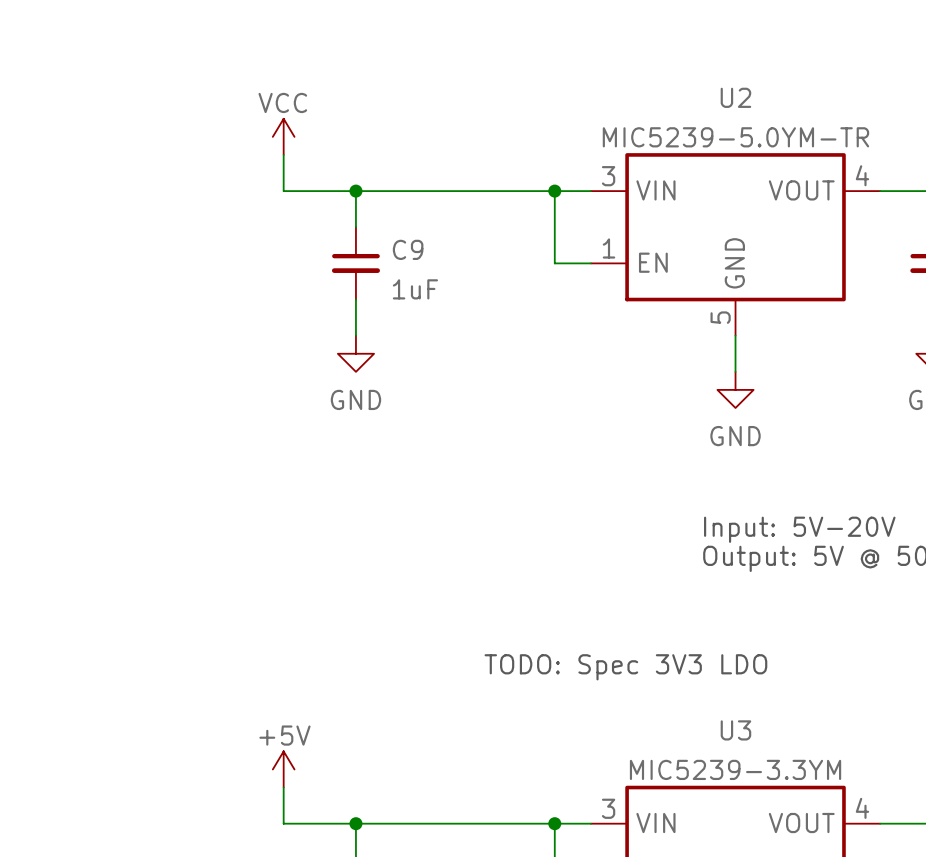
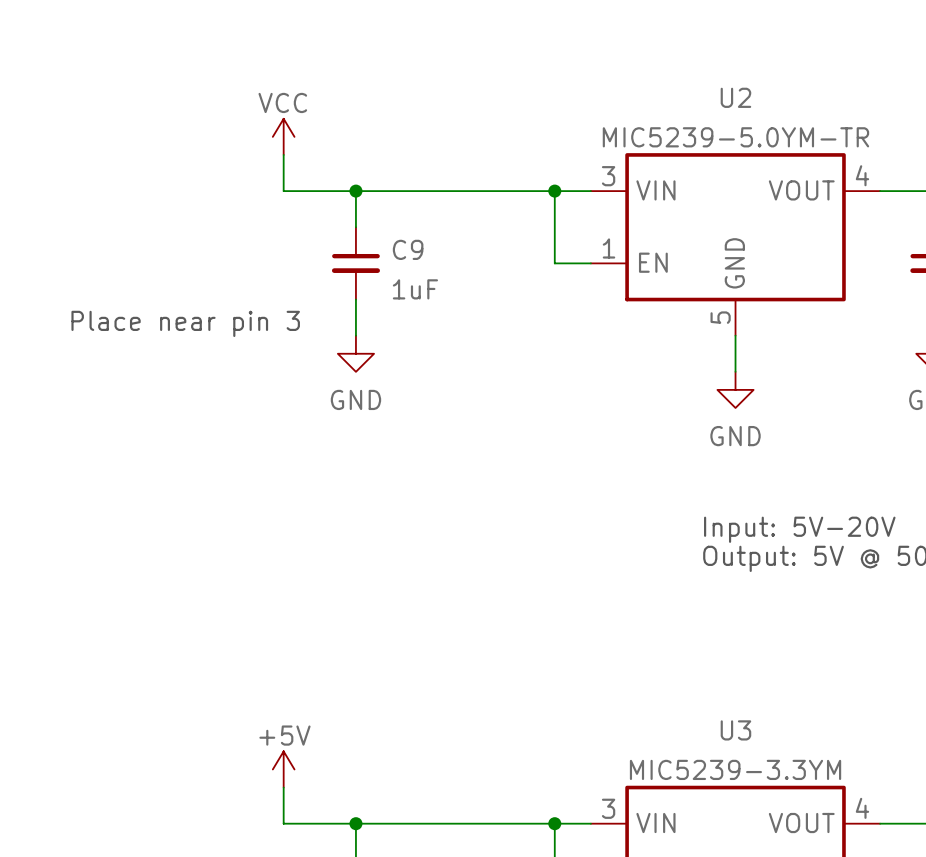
text: none -> Place near pin 3 (185, 323)
text: TODO: Spec 3V3 LDO (625, 667) -> none

